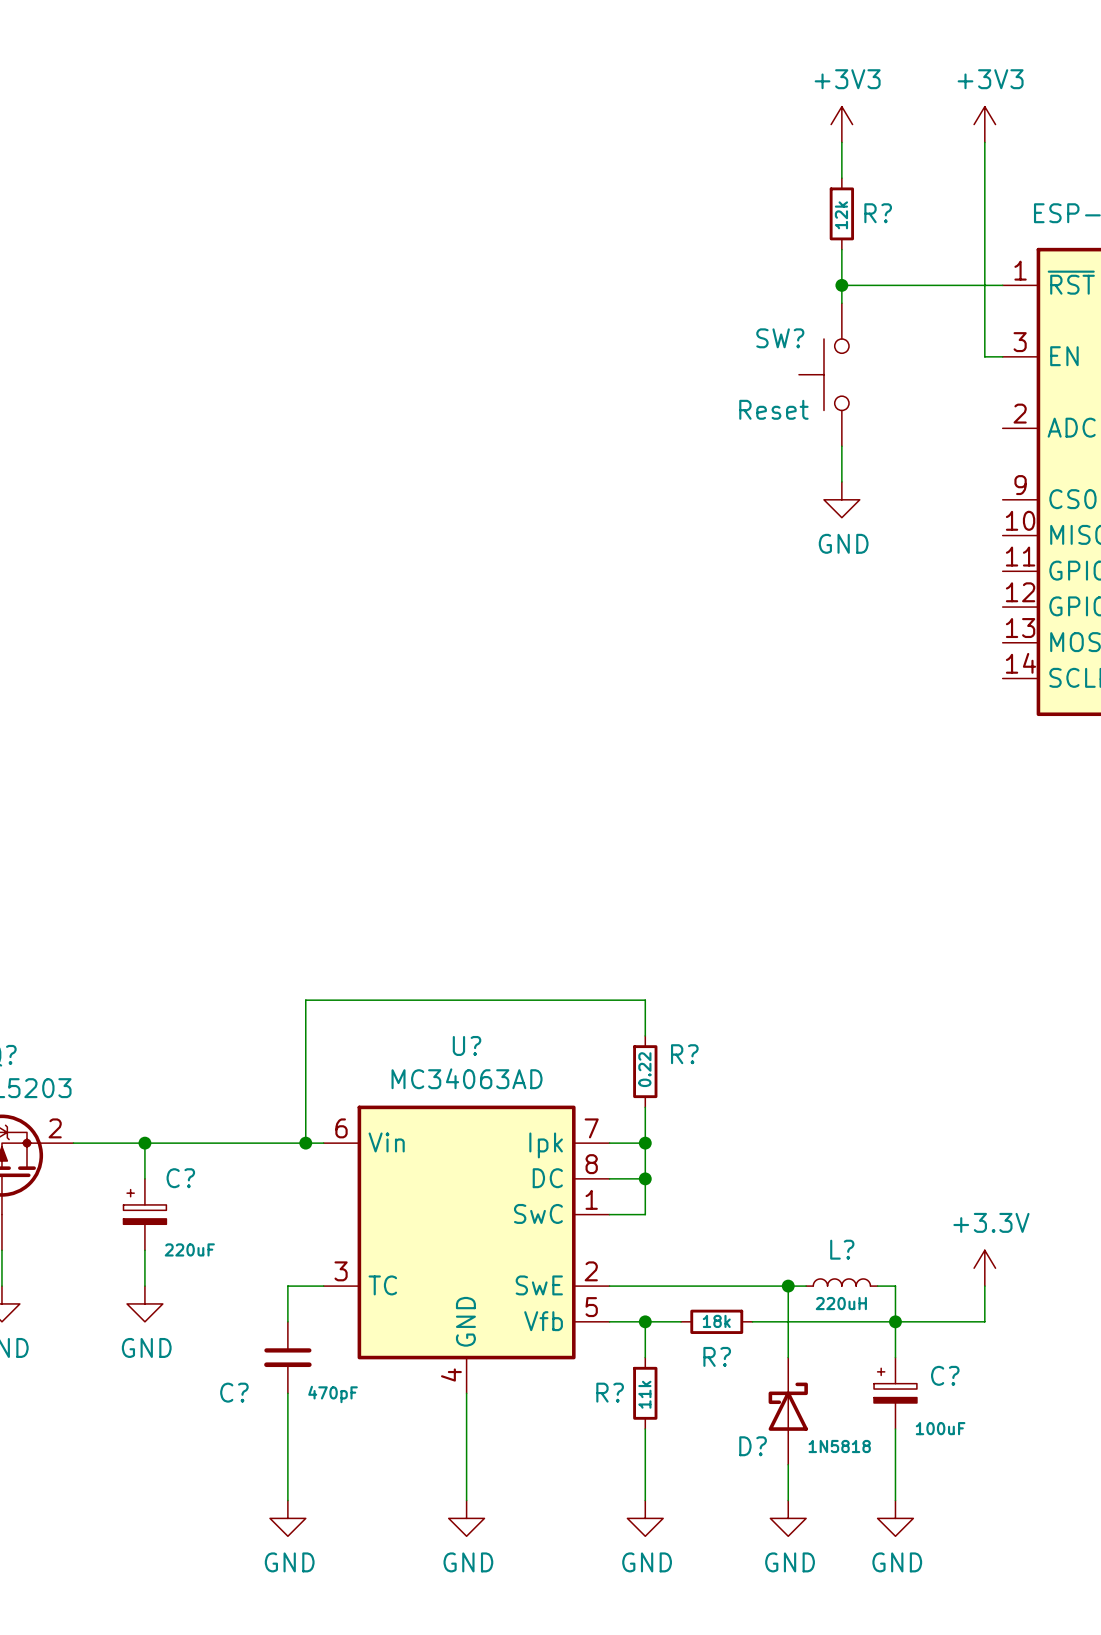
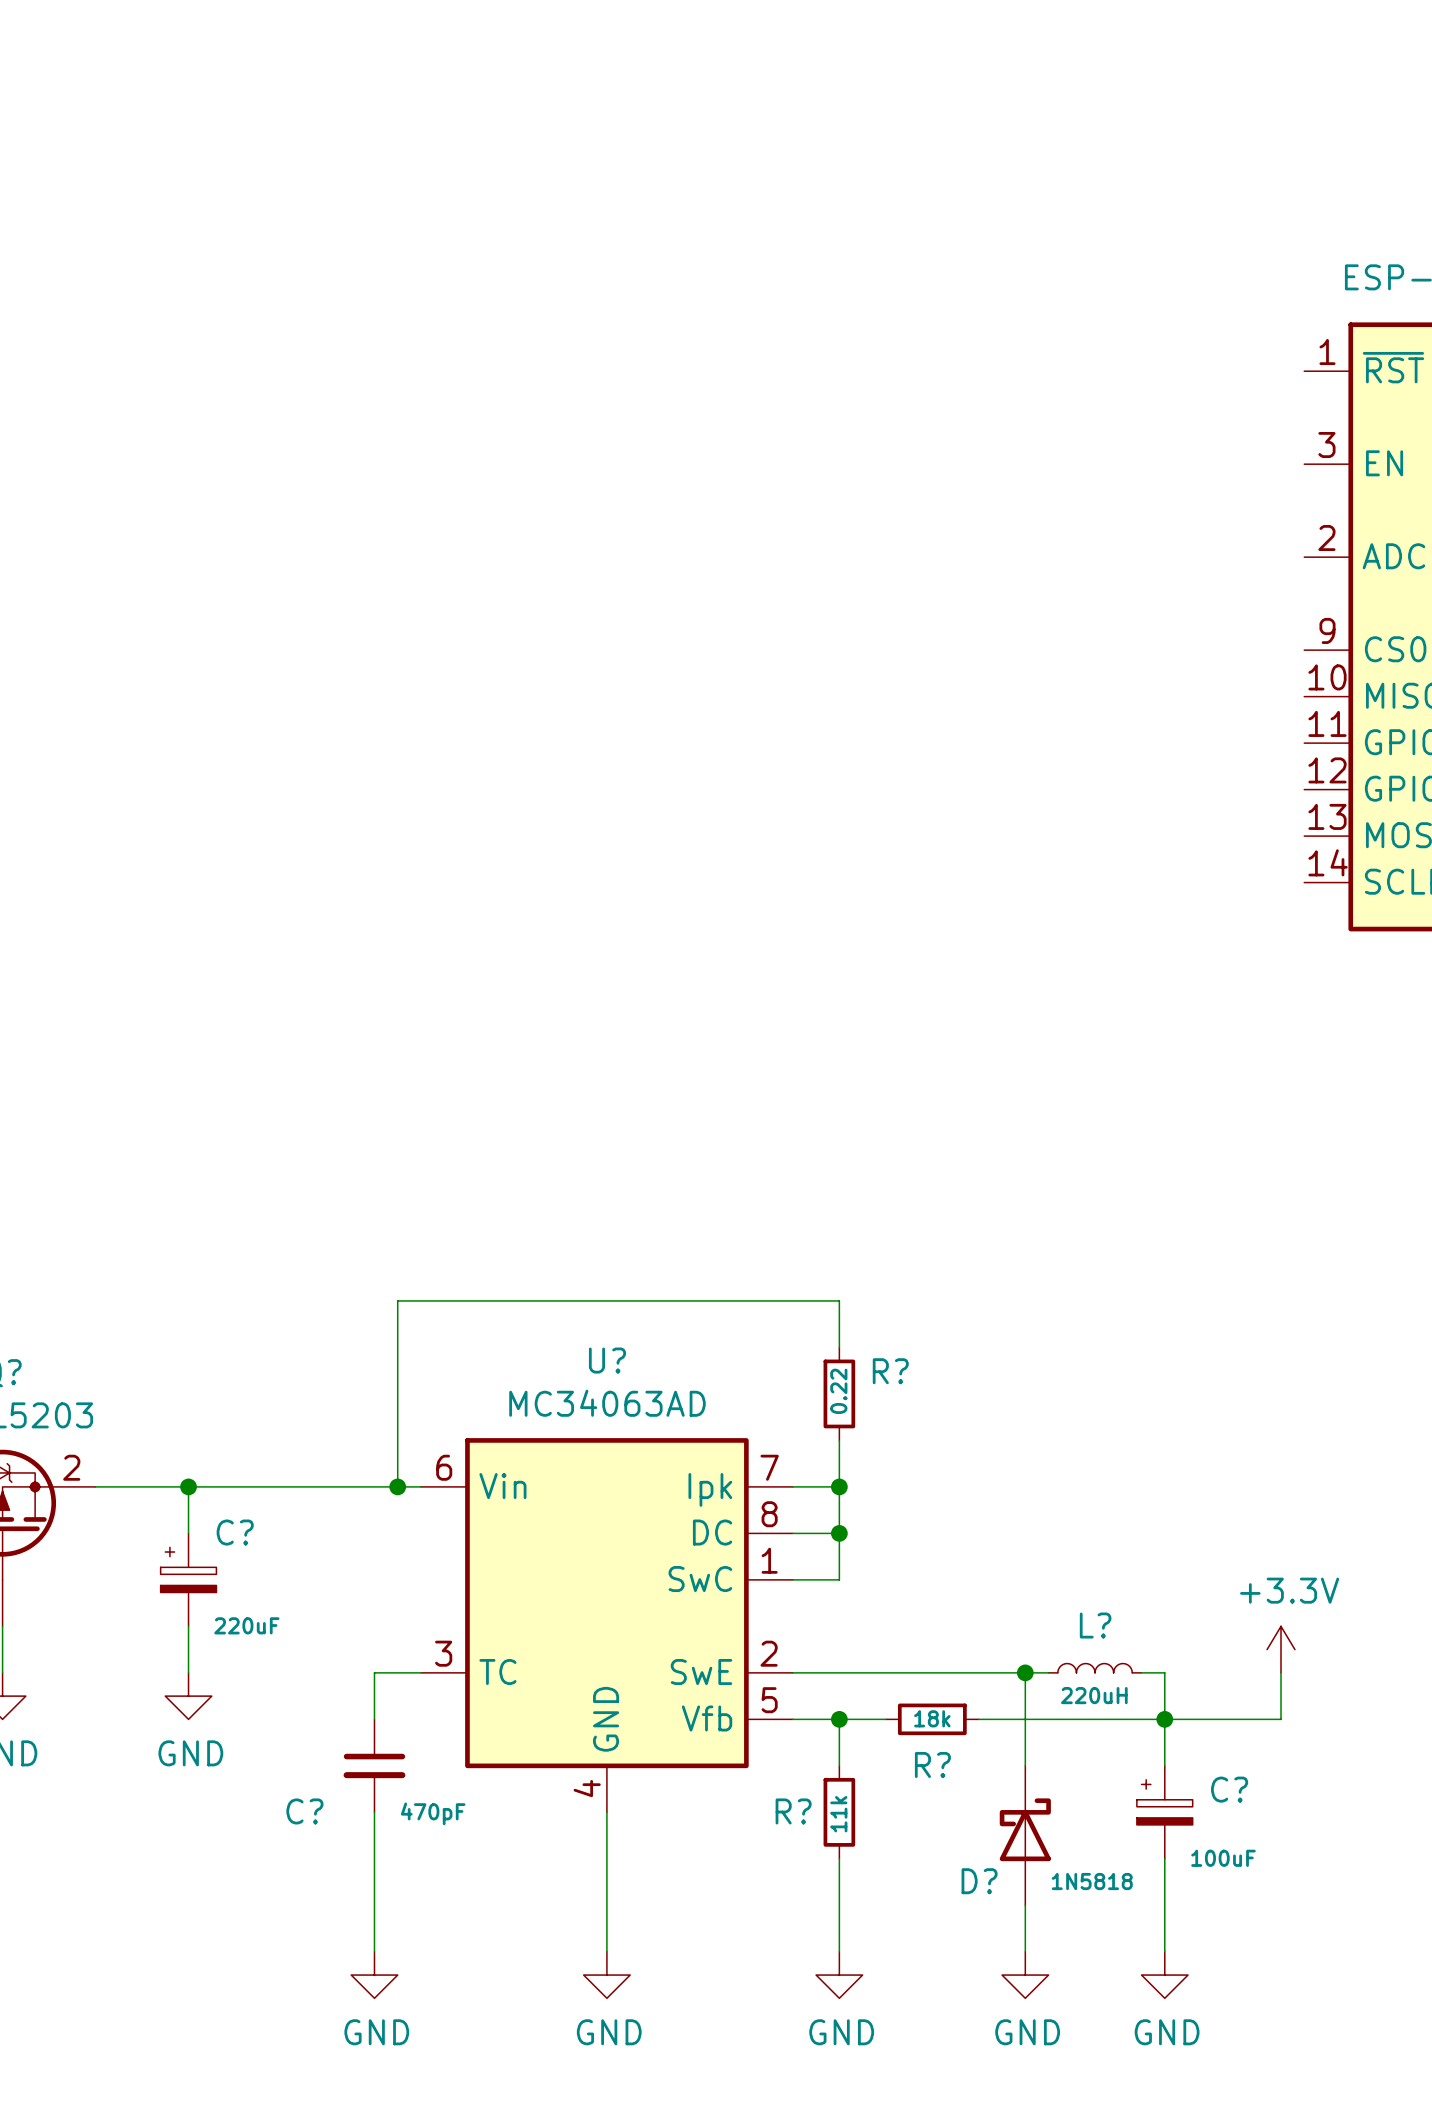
power symbol: +3V3 (841, 124) -> none
power symbol: +3V3 (984, 124) -> none
wire: (841, 142) (841, 178) -> none
wire: (984, 142) (984, 356) (1002, 356) -> none
R?: 12k (841, 213) -> none
wire: (841, 249) (841, 303) -> none
wire: (841, 285) (1002, 285) -> none
junction: (841, 285) -> none
SW?: Reset (823, 374) -> none
wire: (841, 446) (841, 481) -> none
power symbol: GND (841, 499) -> none

